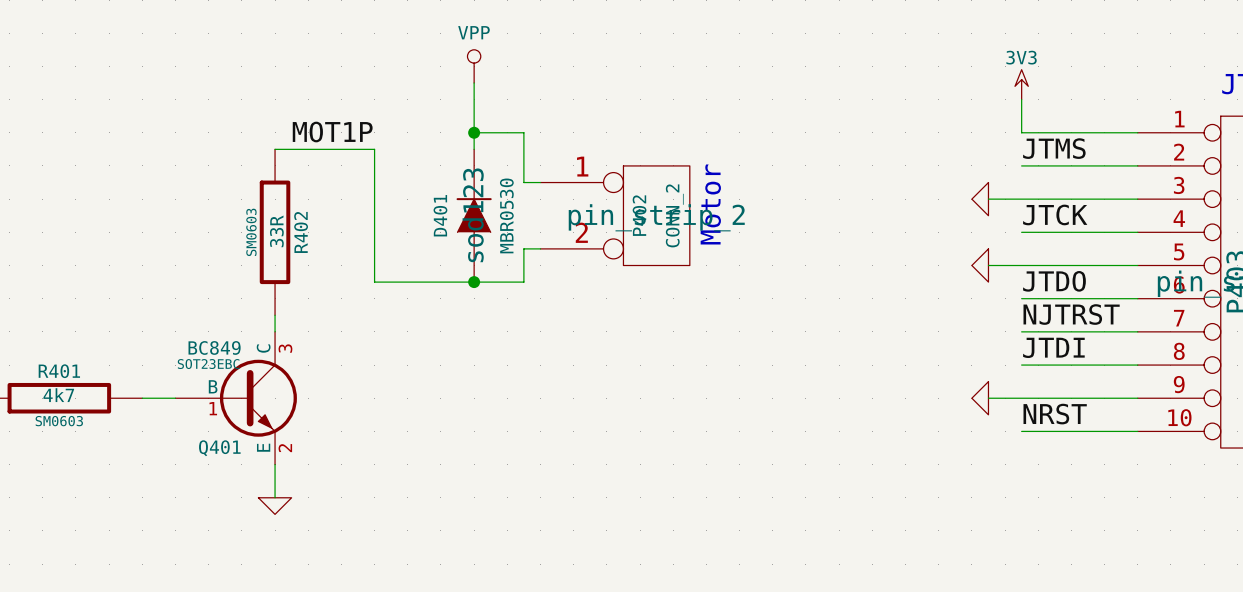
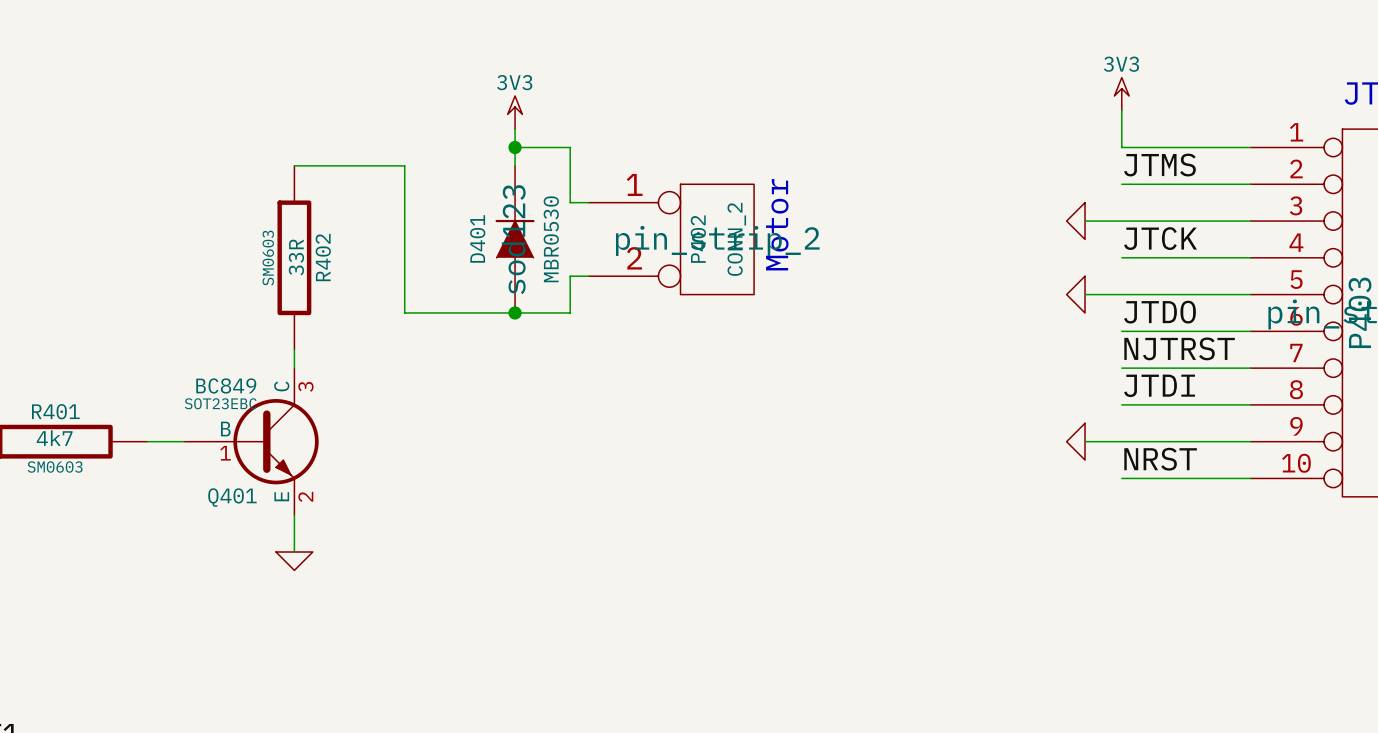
power symbol: VPP (474, 66) -> none
power symbol: none -> 3V3 (515, 112)
label: MOT1P (332, 132) -> none

